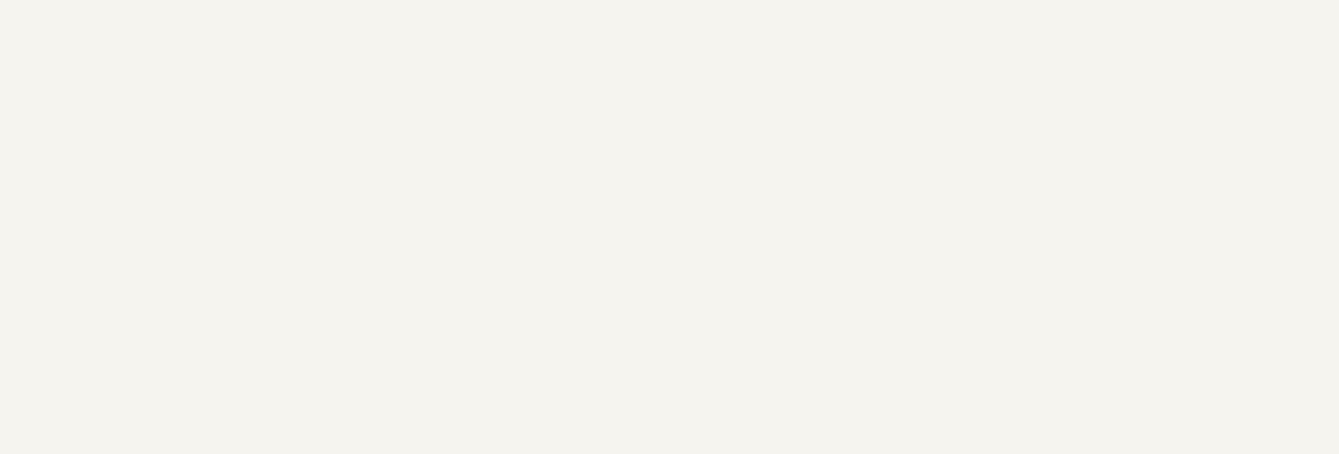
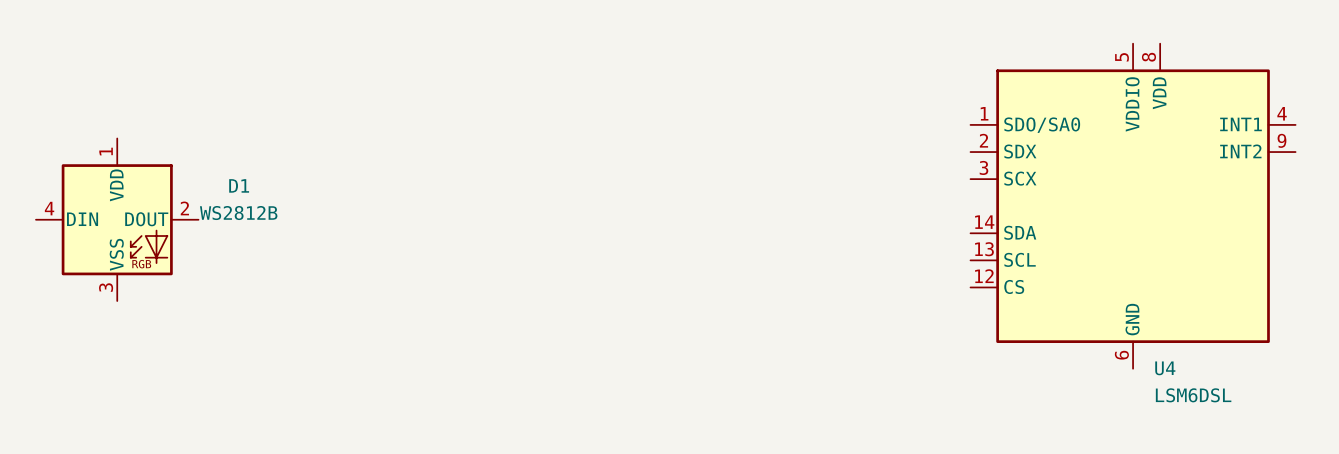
U4: none -> LSM6DSL (1133, 206)
D1: none -> WS2812B (117, 219)

